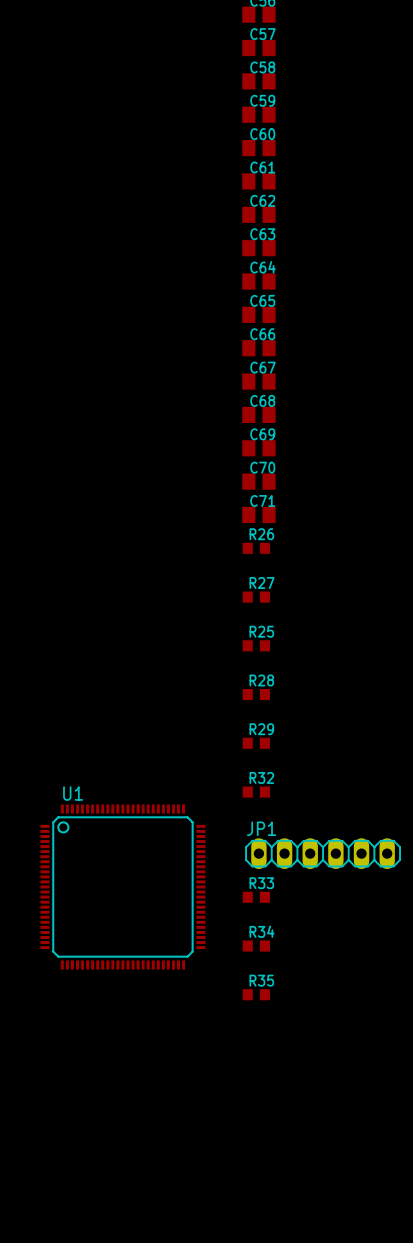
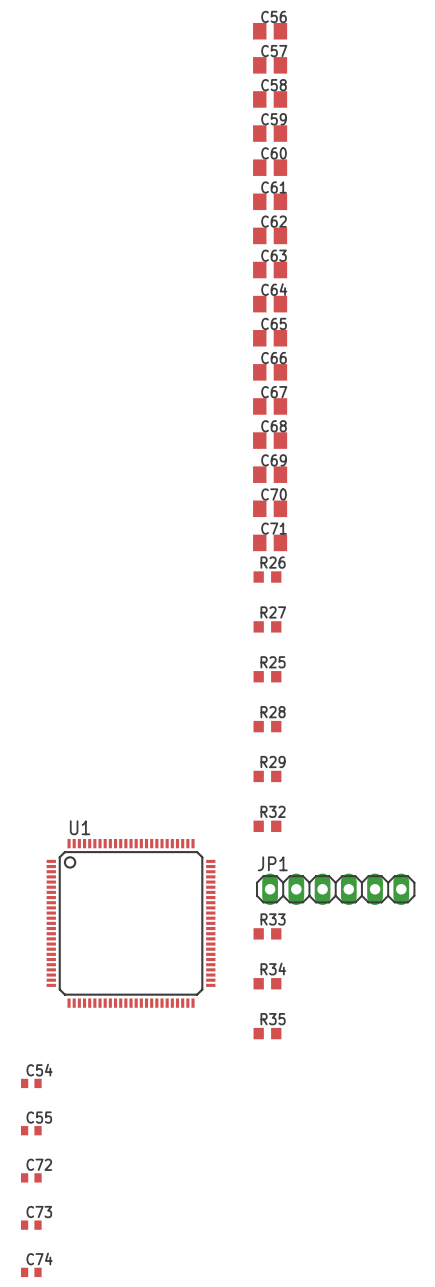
C54: none -> (31, 1083)
C55: none -> (31, 1130)
C72: none -> (31, 1177)
C73: none -> (31, 1225)
C74: none -> (31, 1272)

